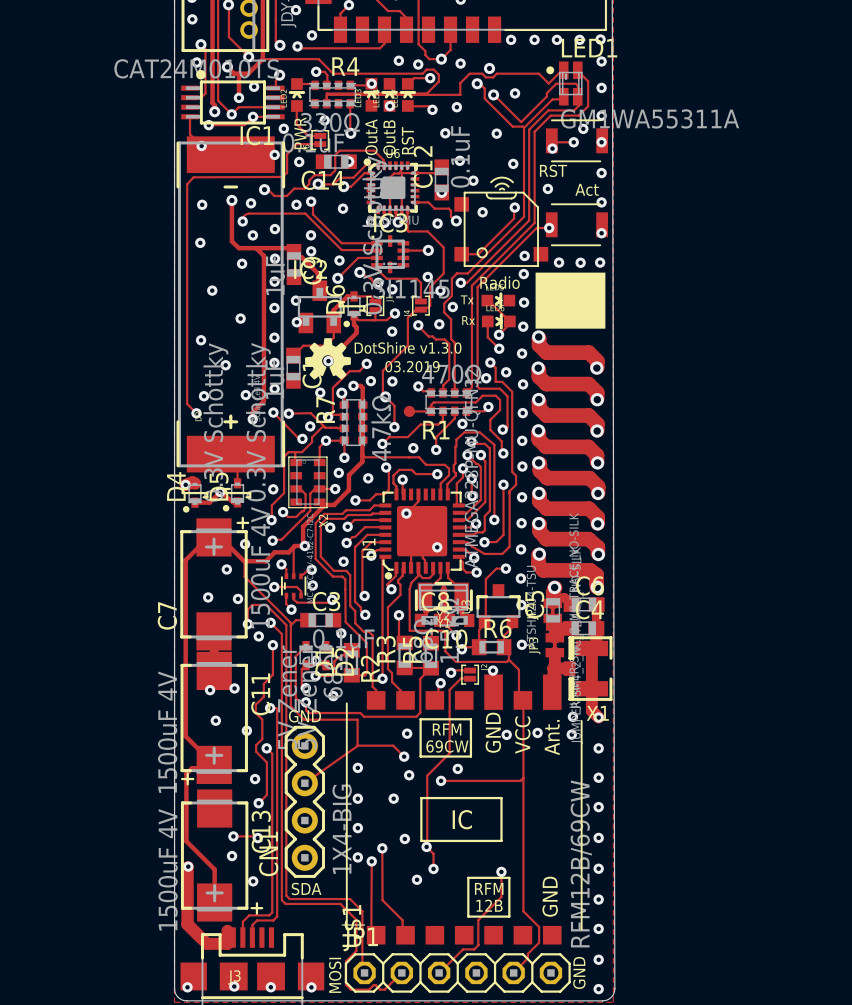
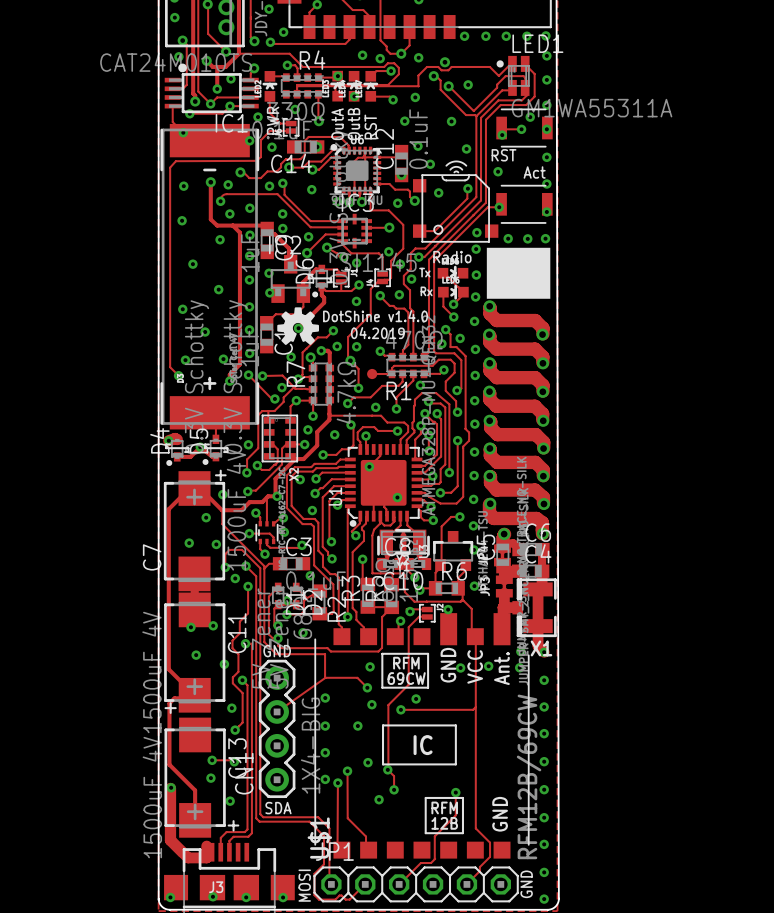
text: DotShine v1.3.0 (408, 347) -> DotShine v1.4.0 (375, 316)
text: 03.2019 (412, 366) -> 04.2019 (377, 333)

